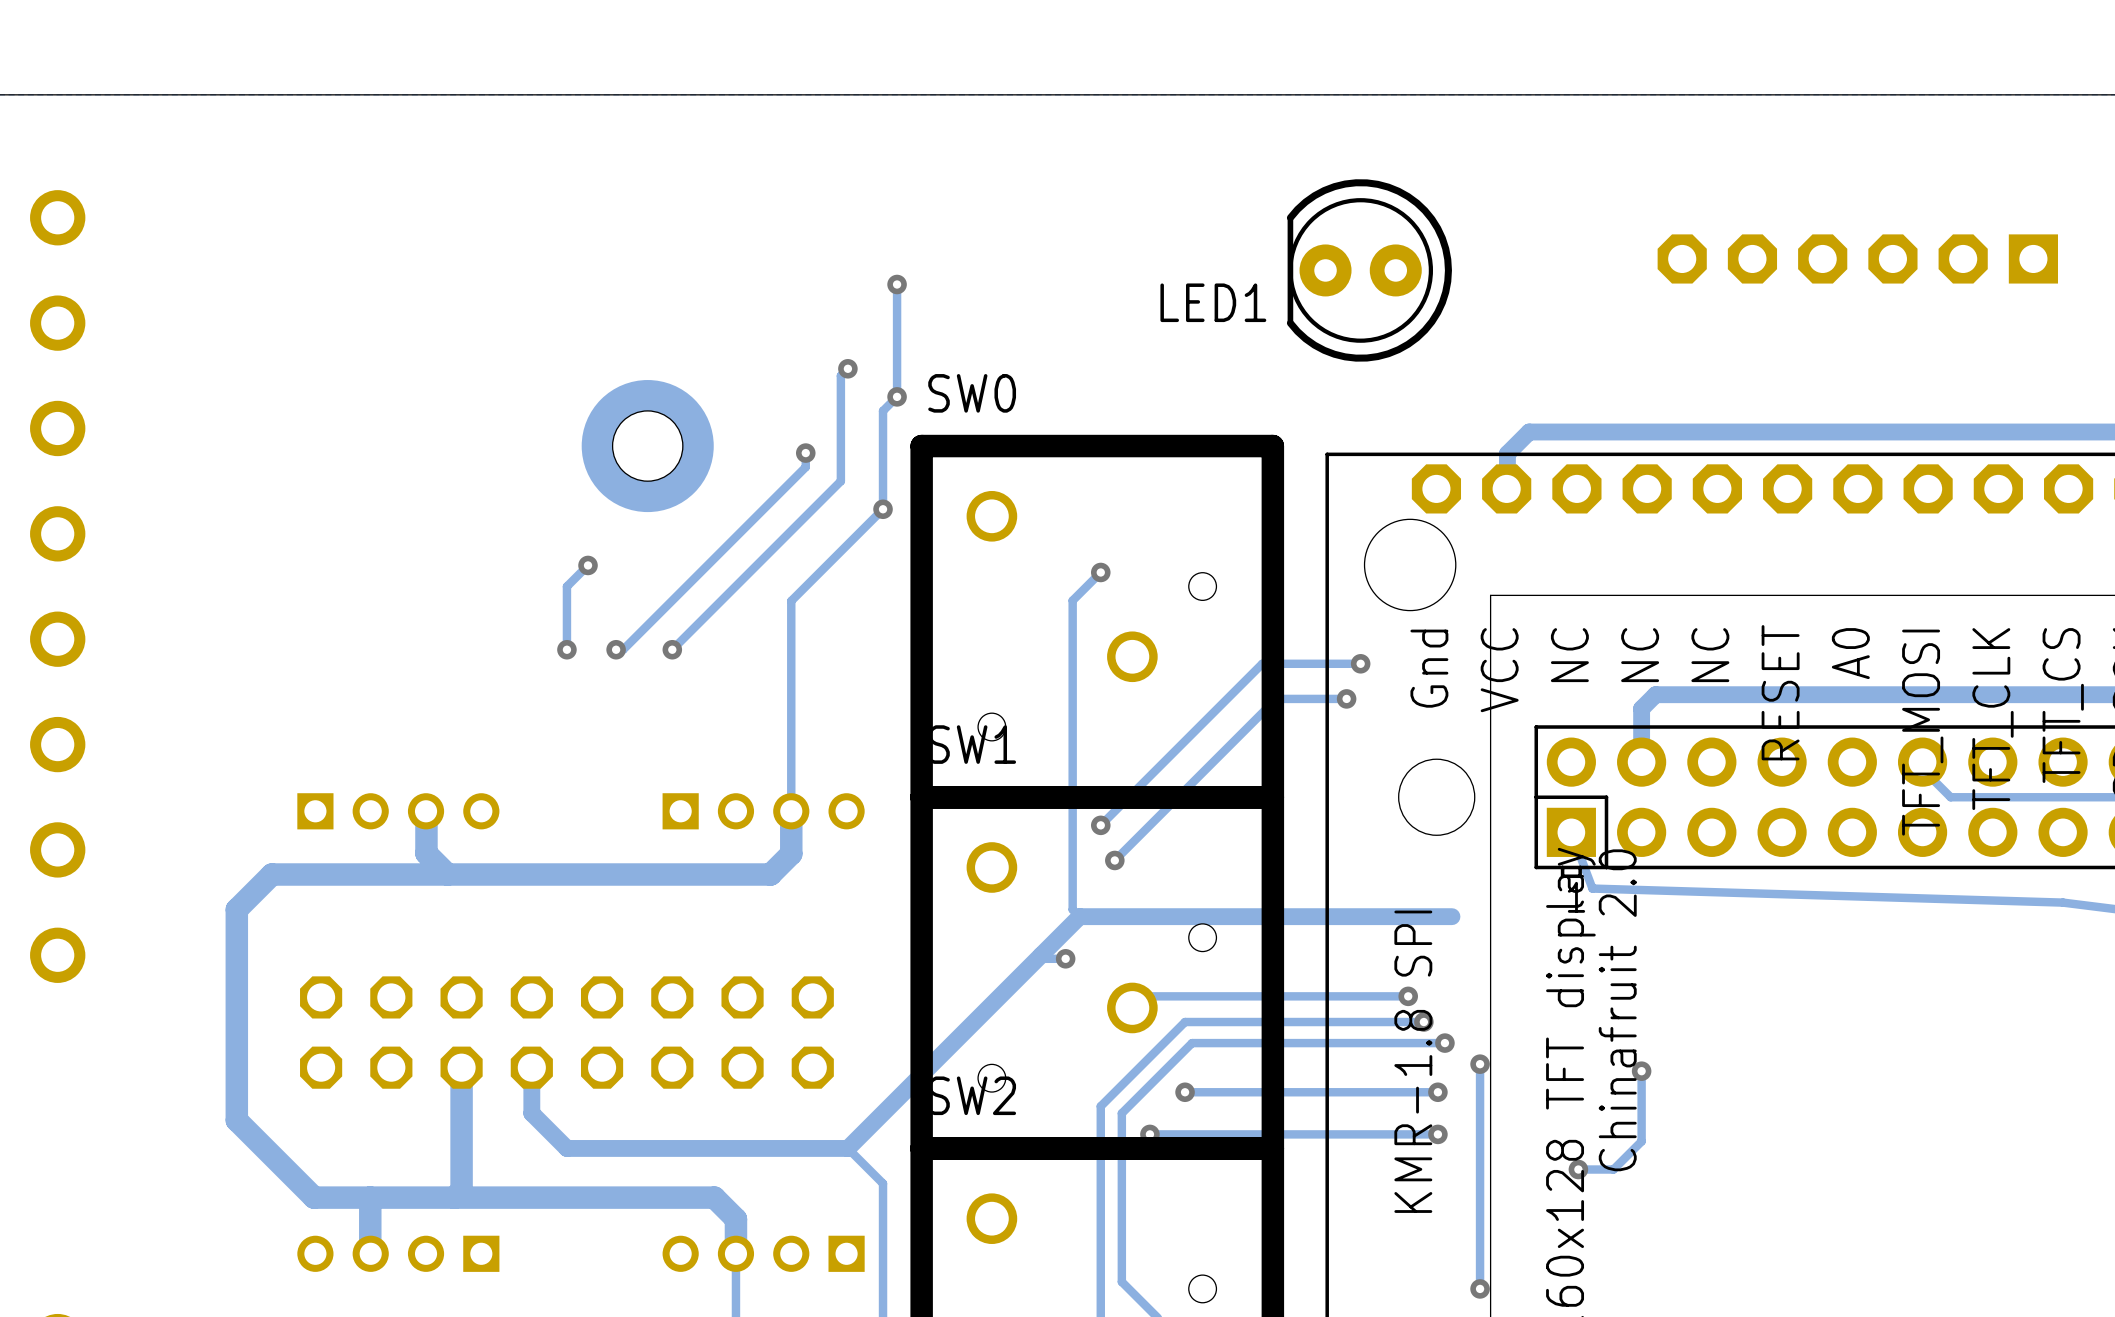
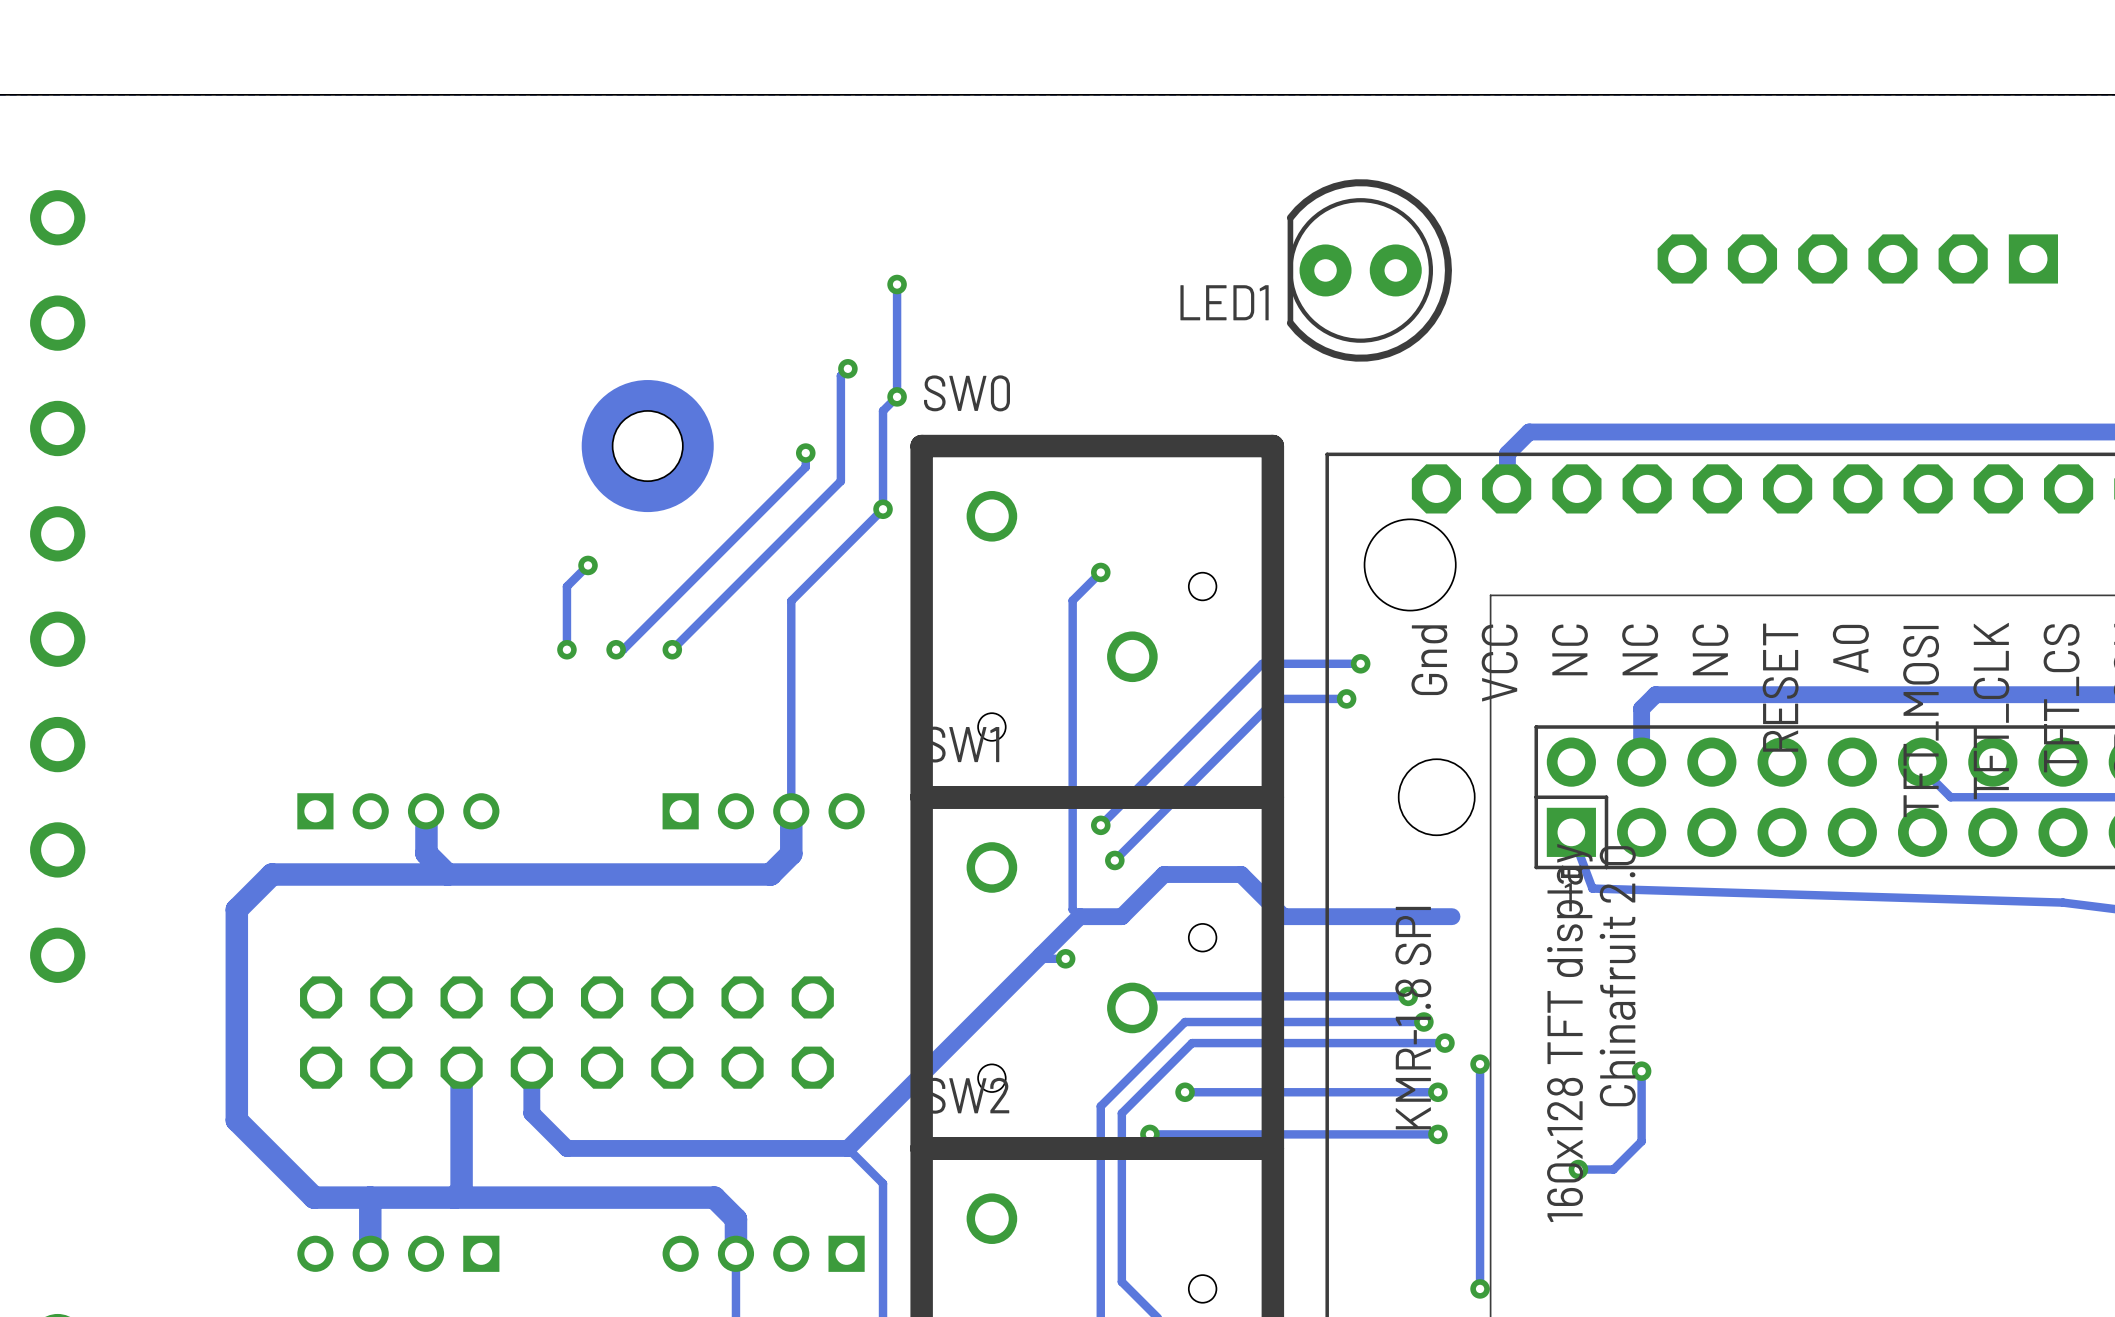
track: (1283, 916) (1121, 916) -> (1283, 916) (1241, 874) (1163, 874) (1121, 916)

